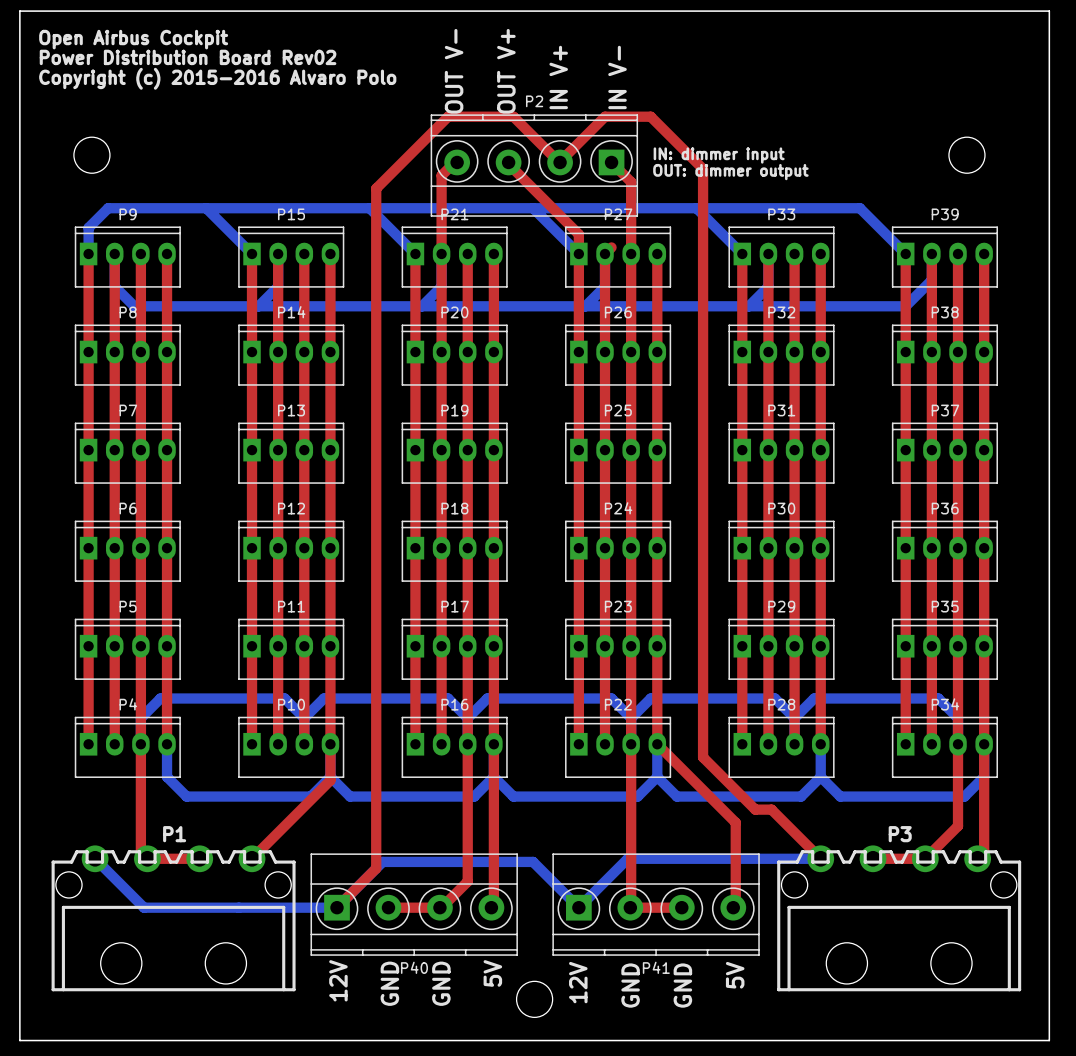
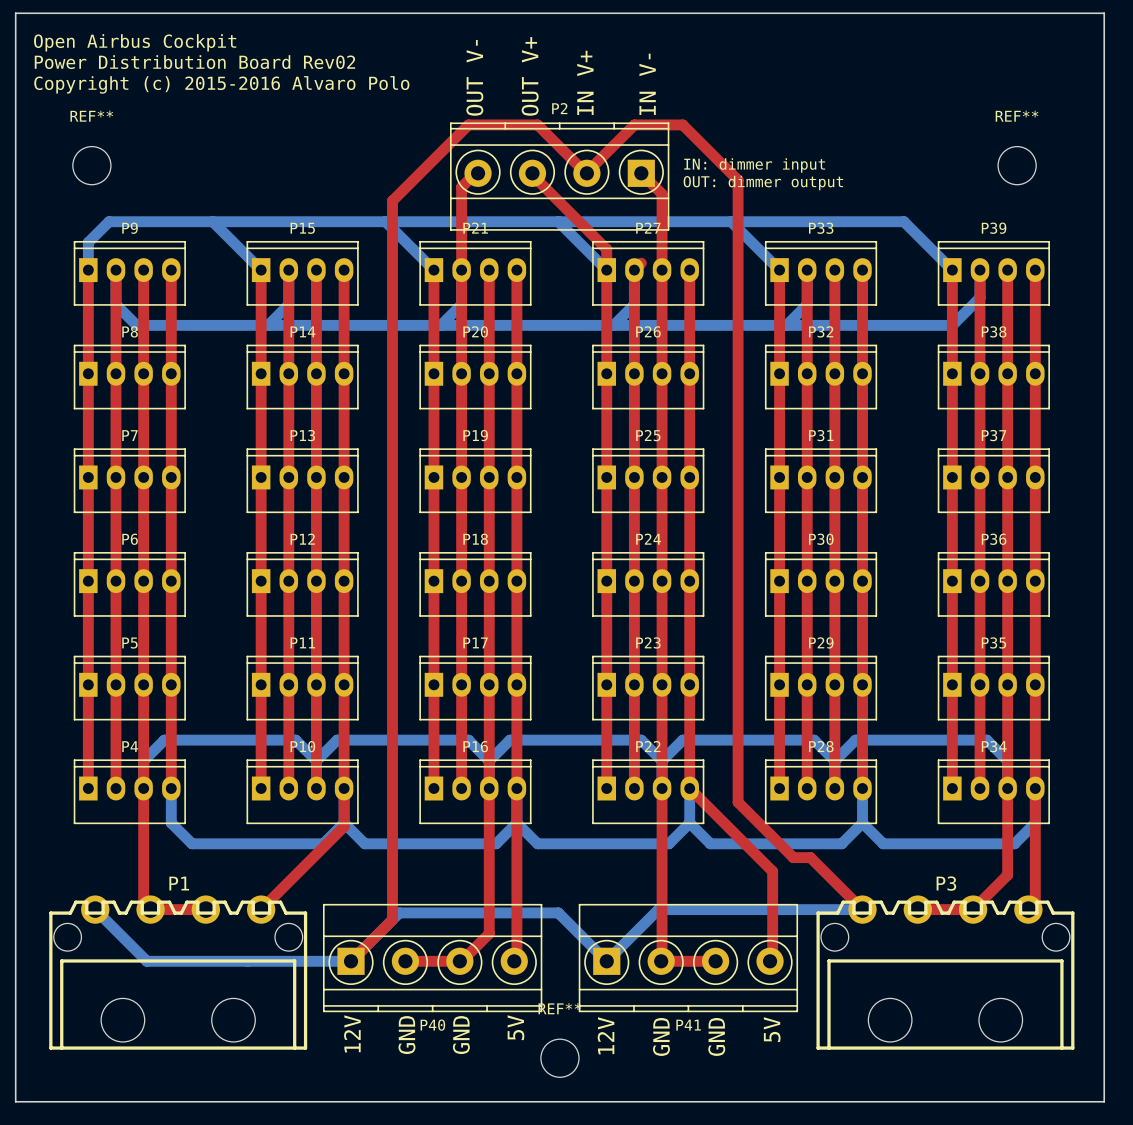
REF** name: none -> REF** (91, 116)
REF** name: none -> REF** (1017, 116)
REF** name: none -> REF** (559, 1008)

